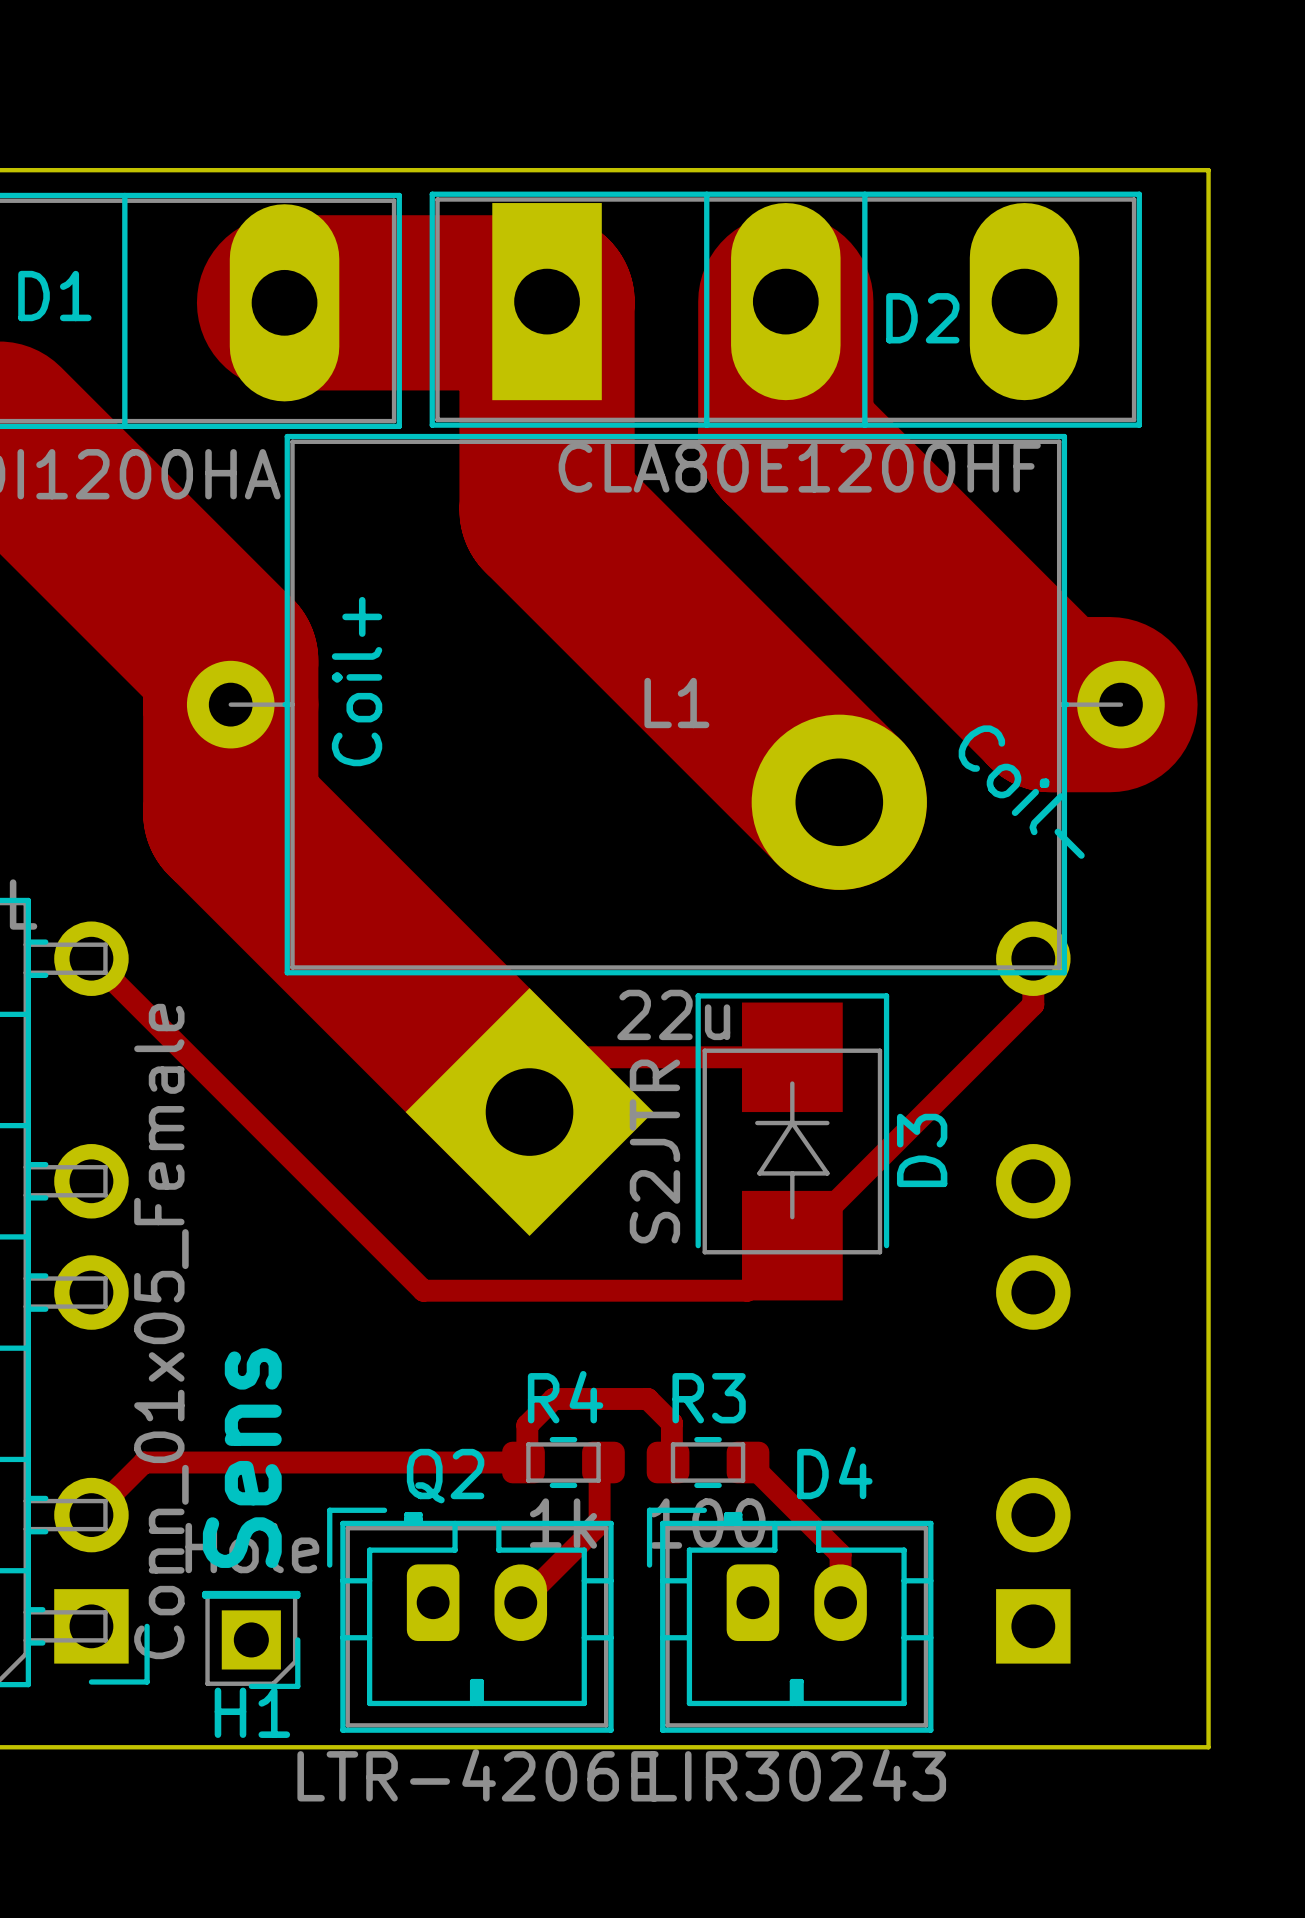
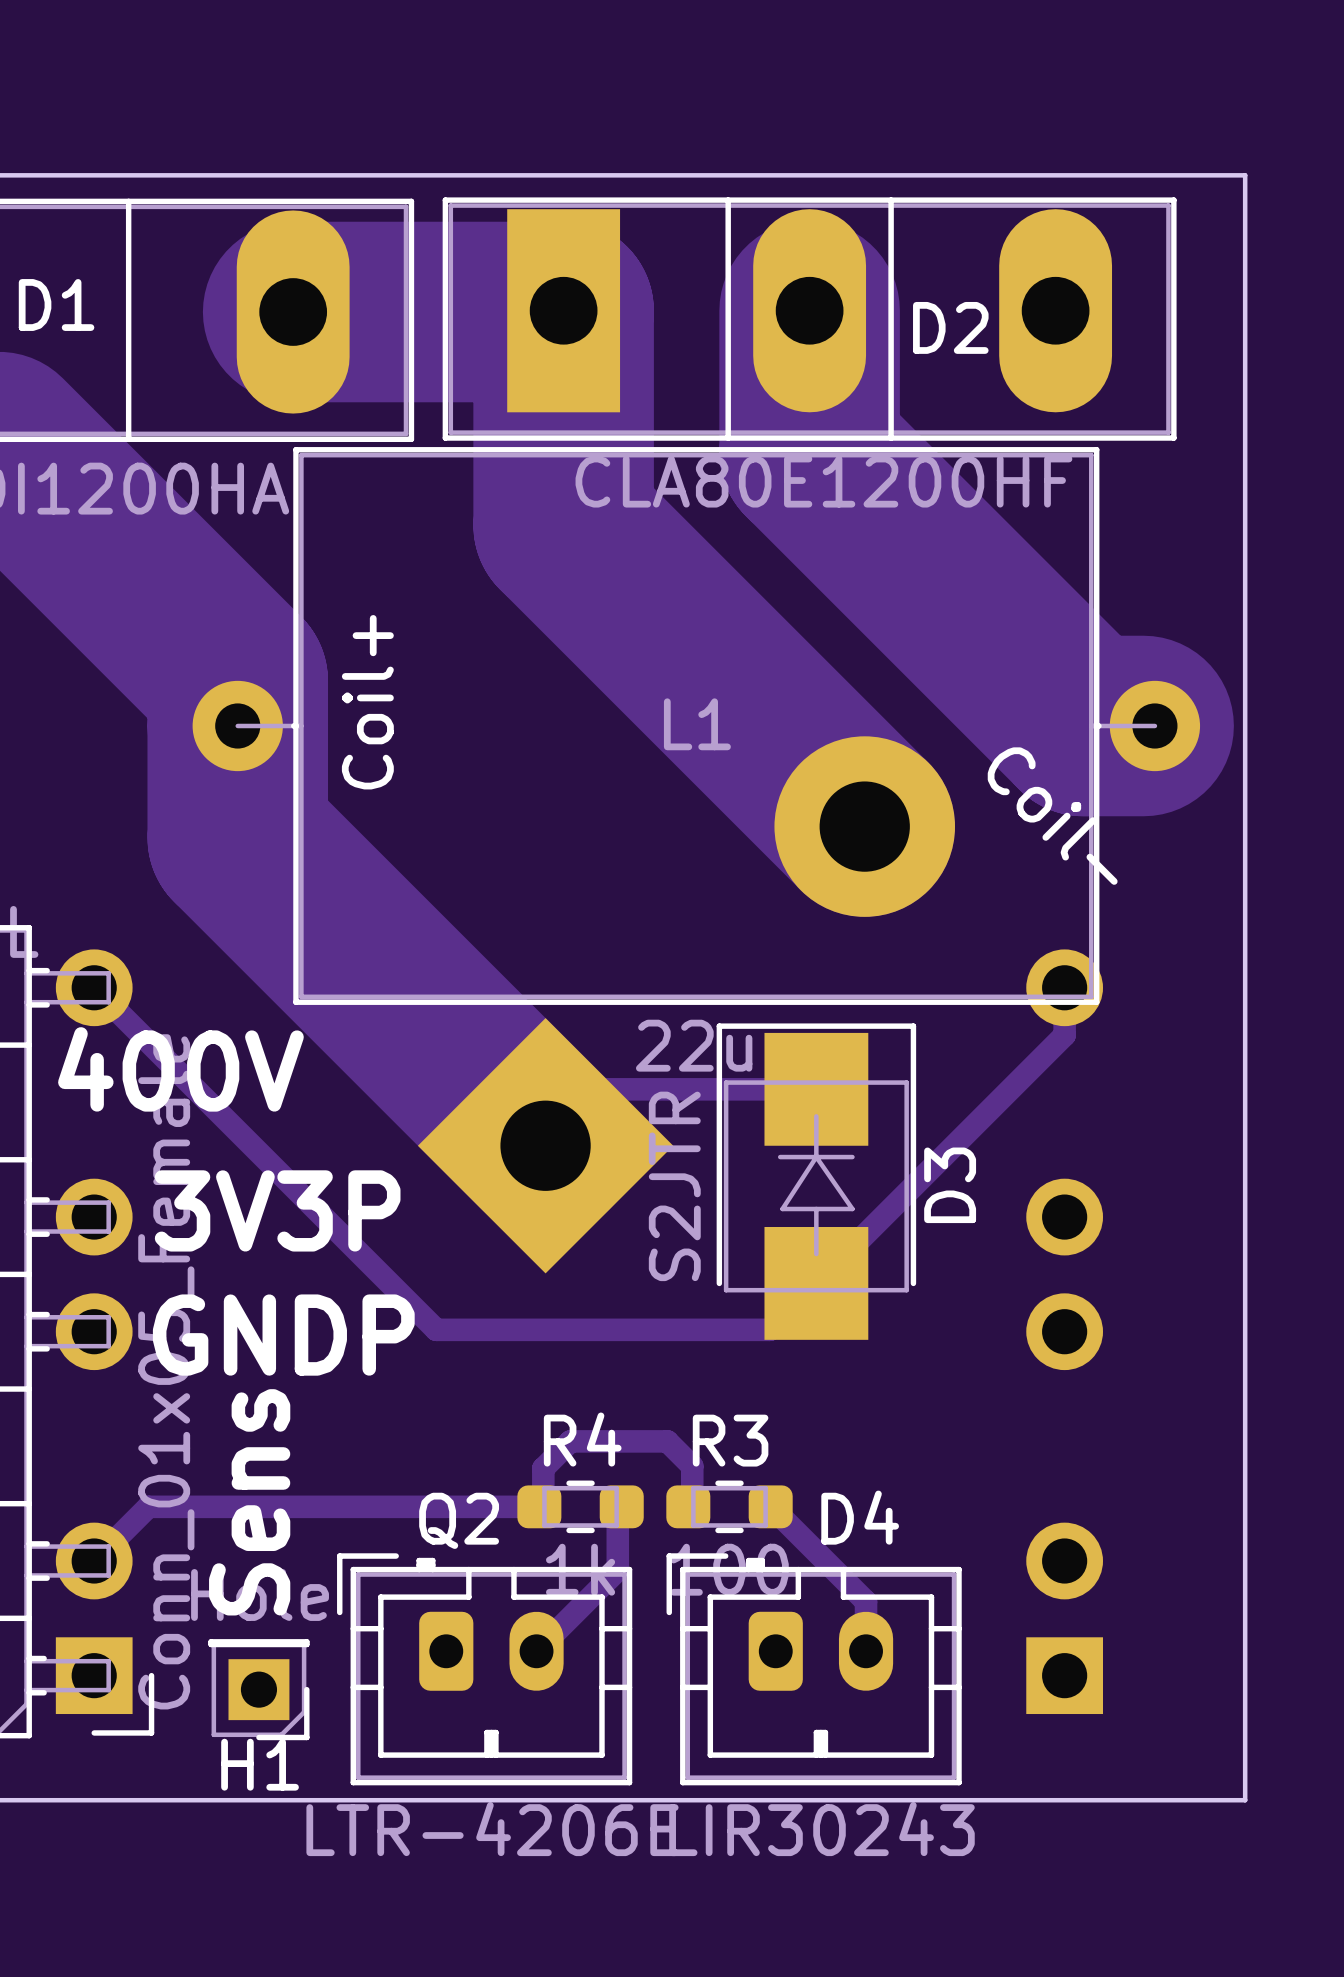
text: none -> 400V (180, 1069)
text: none -> 3V3P (277, 1210)
text: none -> GNDP (283, 1335)

